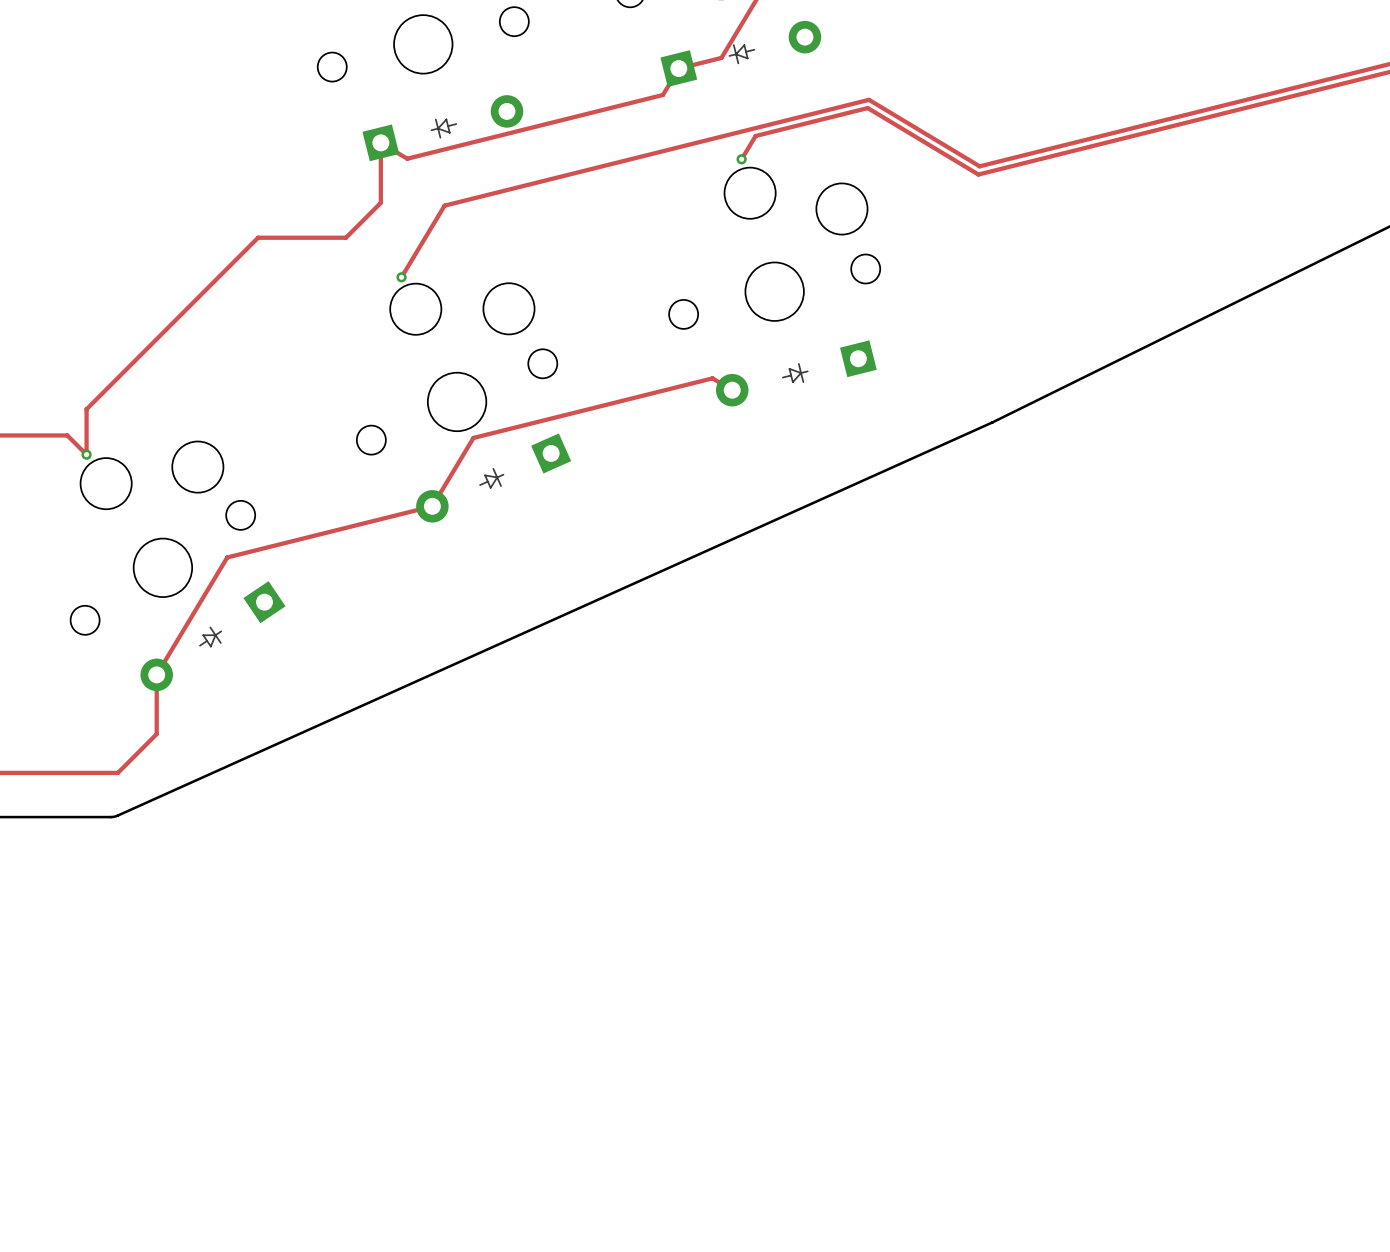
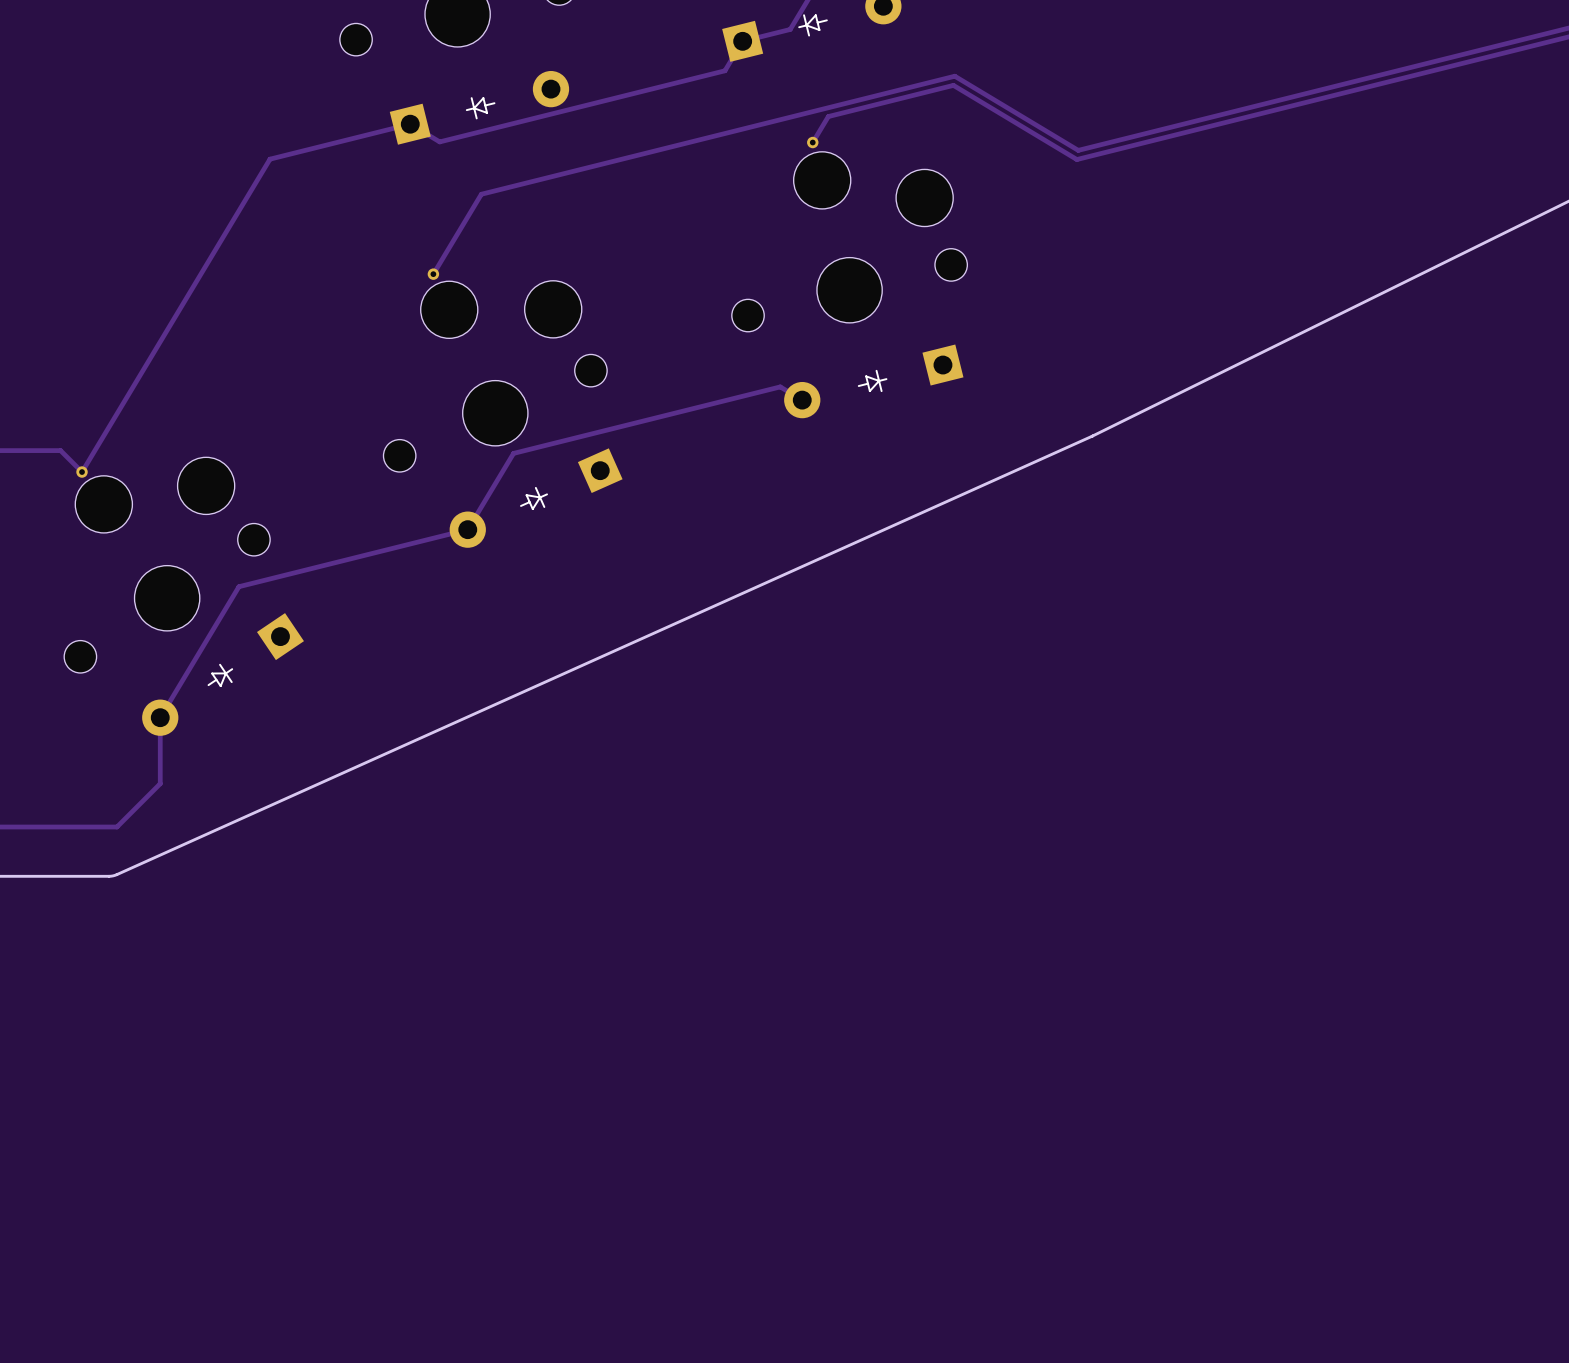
track: (407, 158) (380, 142) (380, 202) (345, 237) (258, 237) (86, 409) (86, 454) -> (439, 141) (410, 124) (270, 159) (82, 472)

